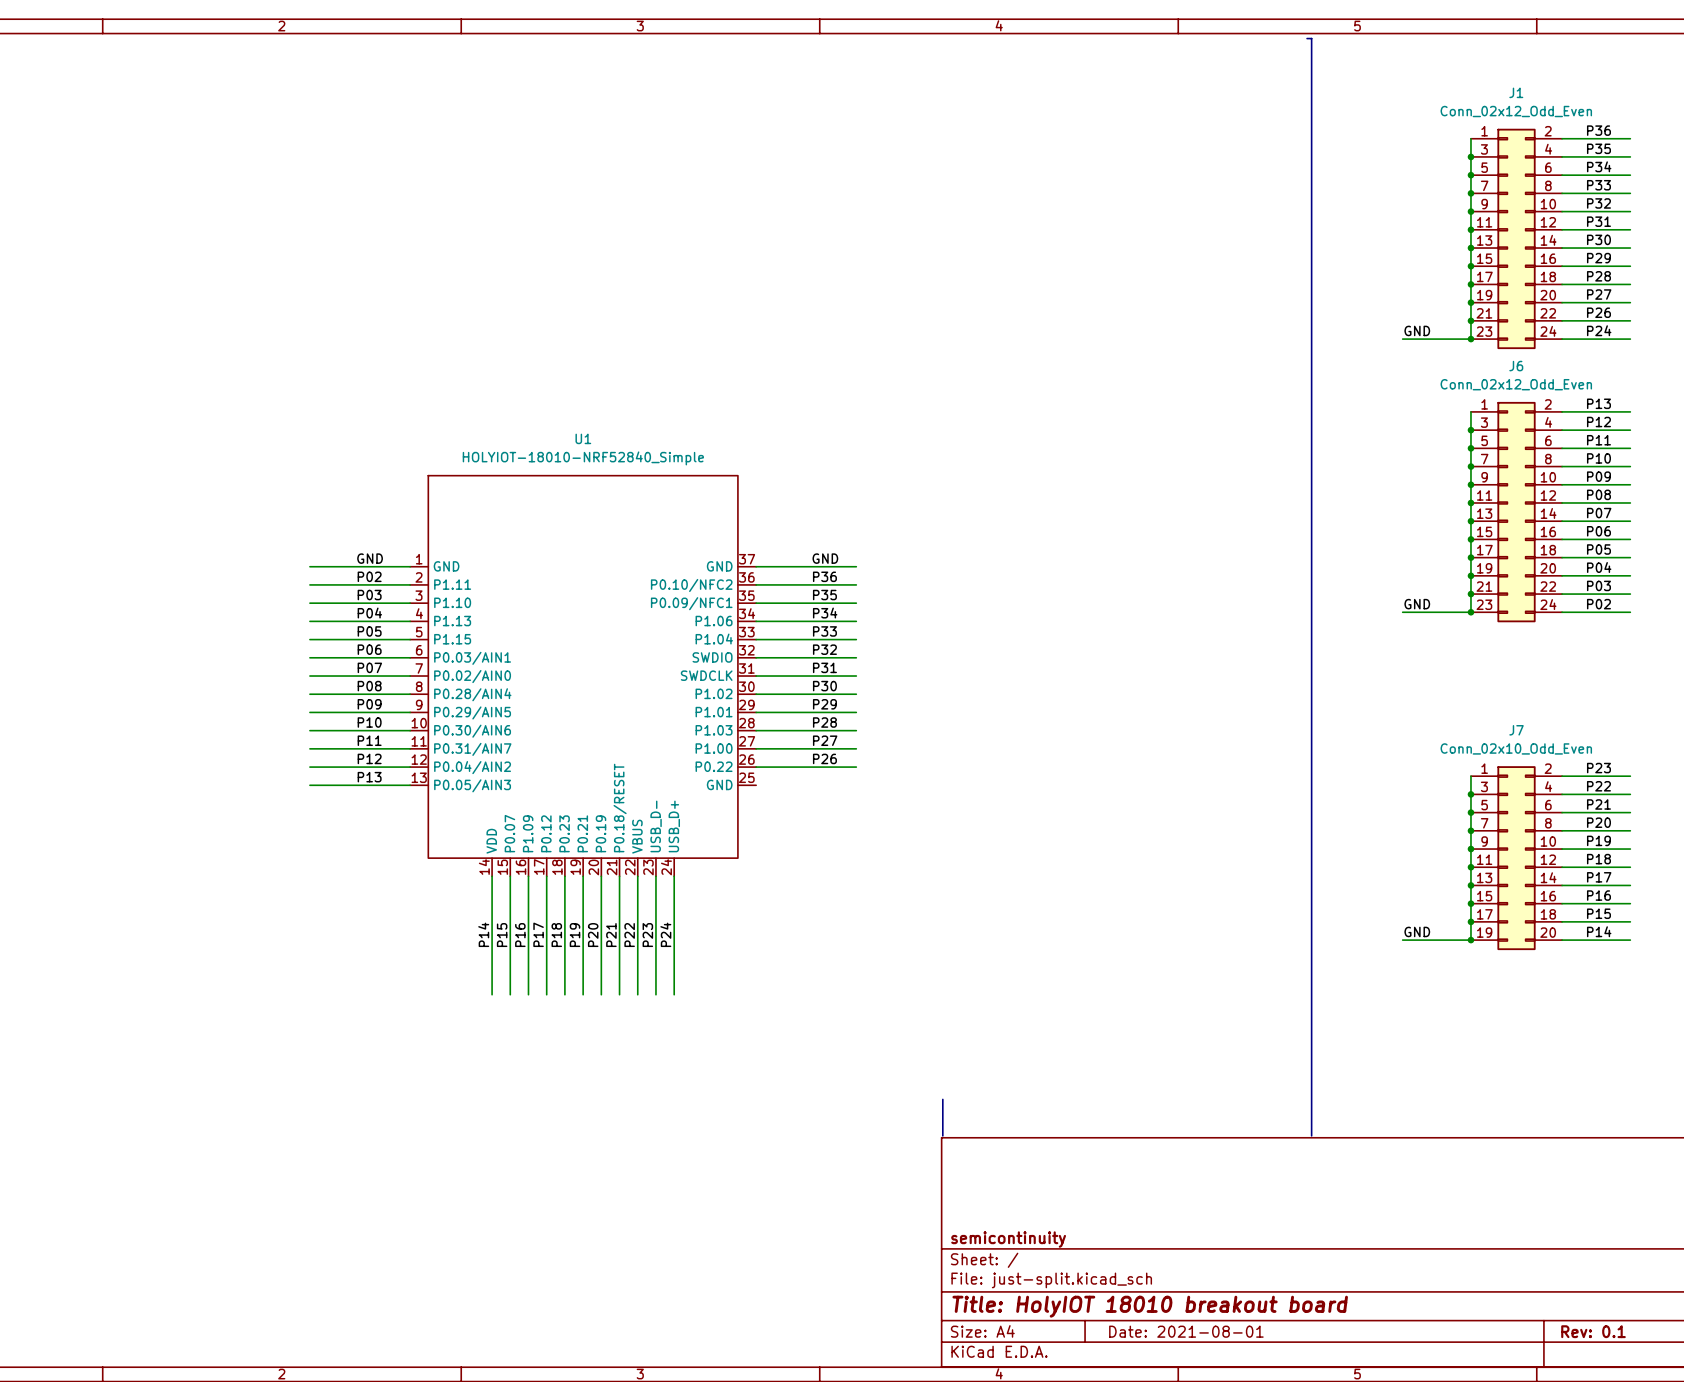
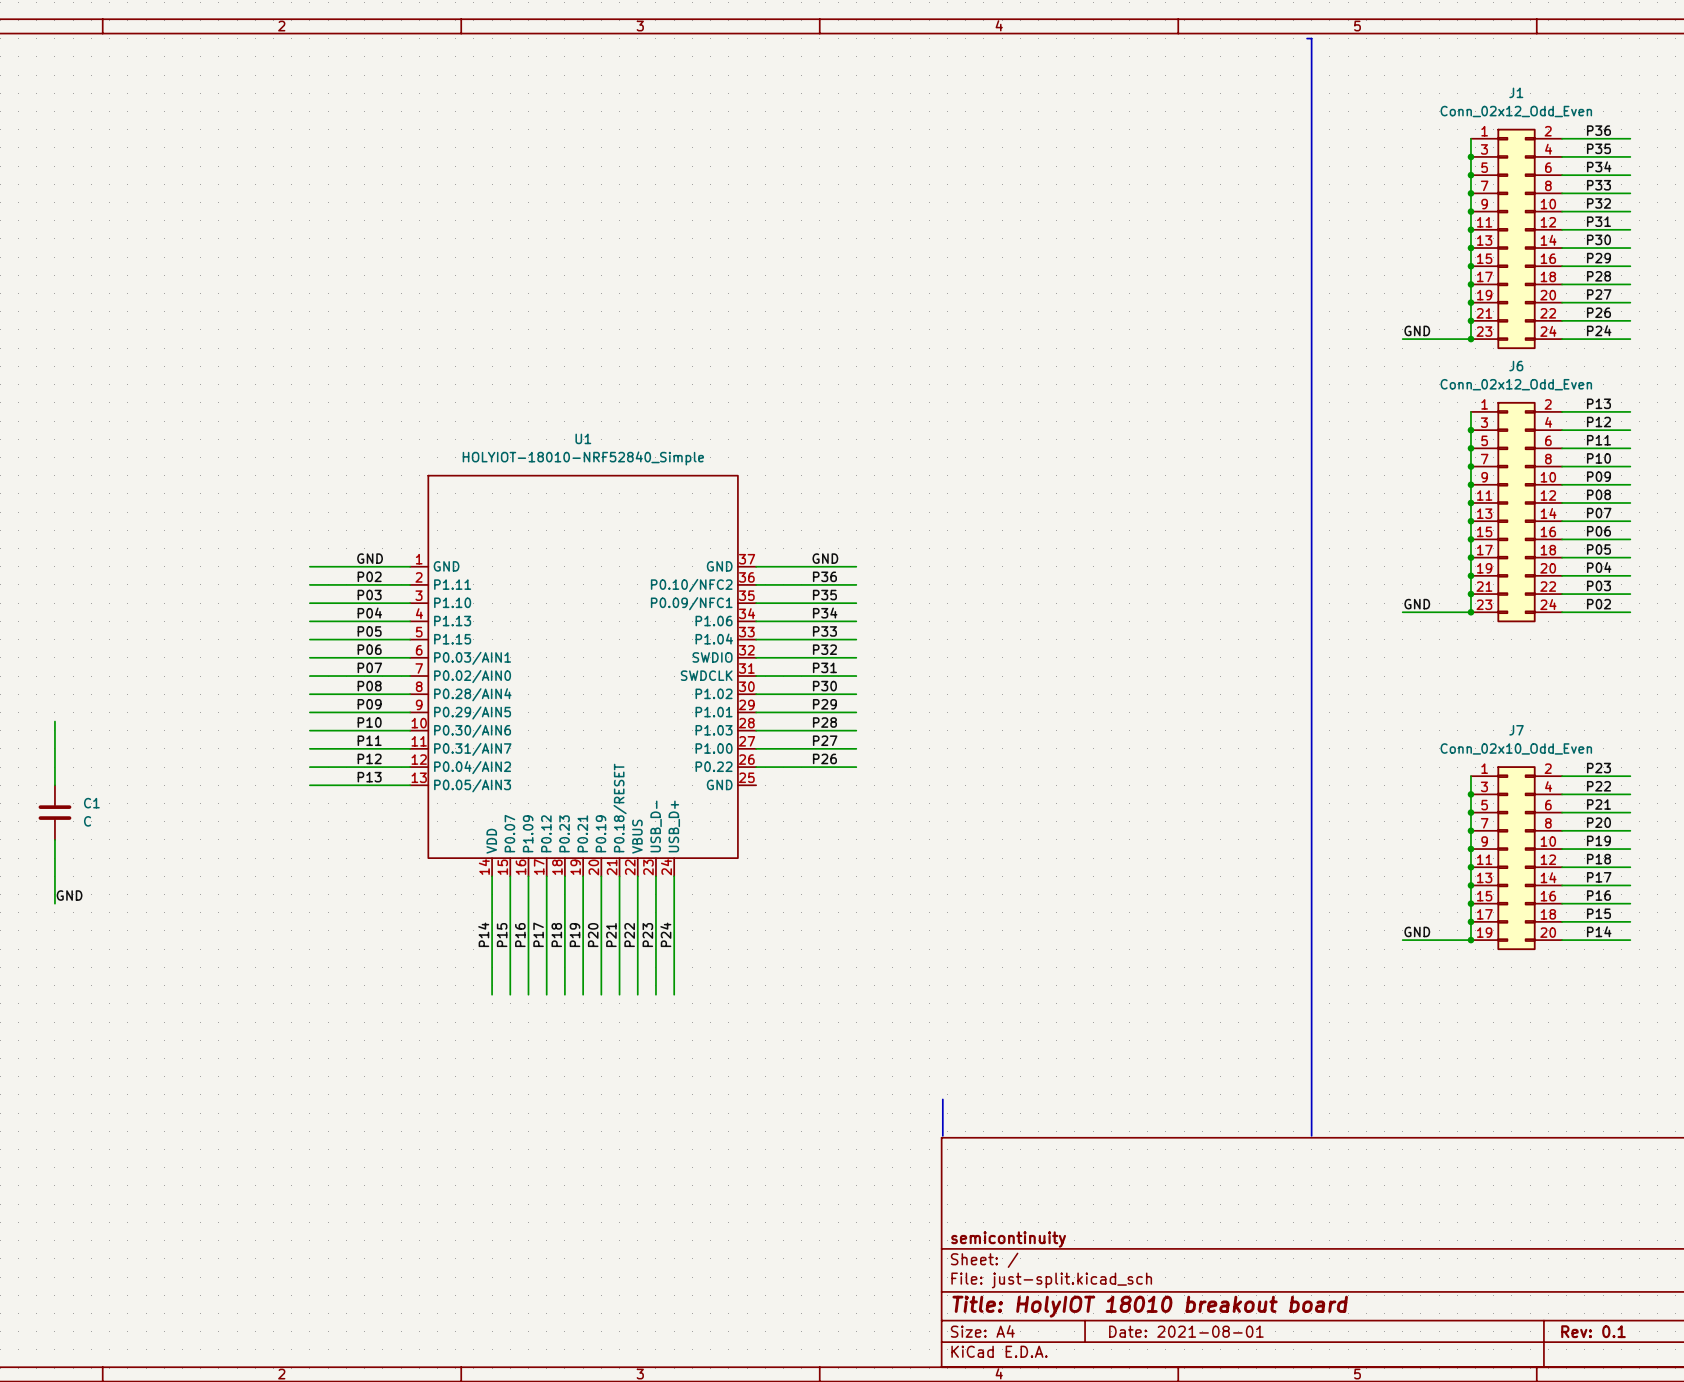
wire: none -> (54, 721) (54, 785)
C1: none -> C (54, 812)
wire: none -> (54, 839) (54, 903)
label: none -> GND (69, 895)

